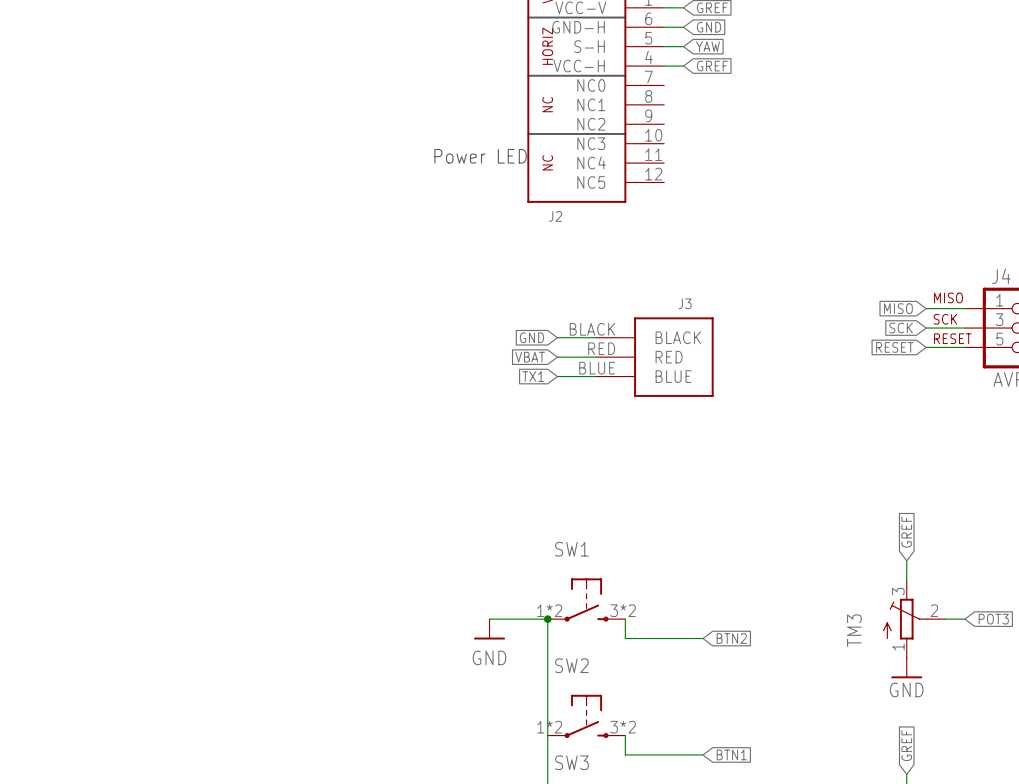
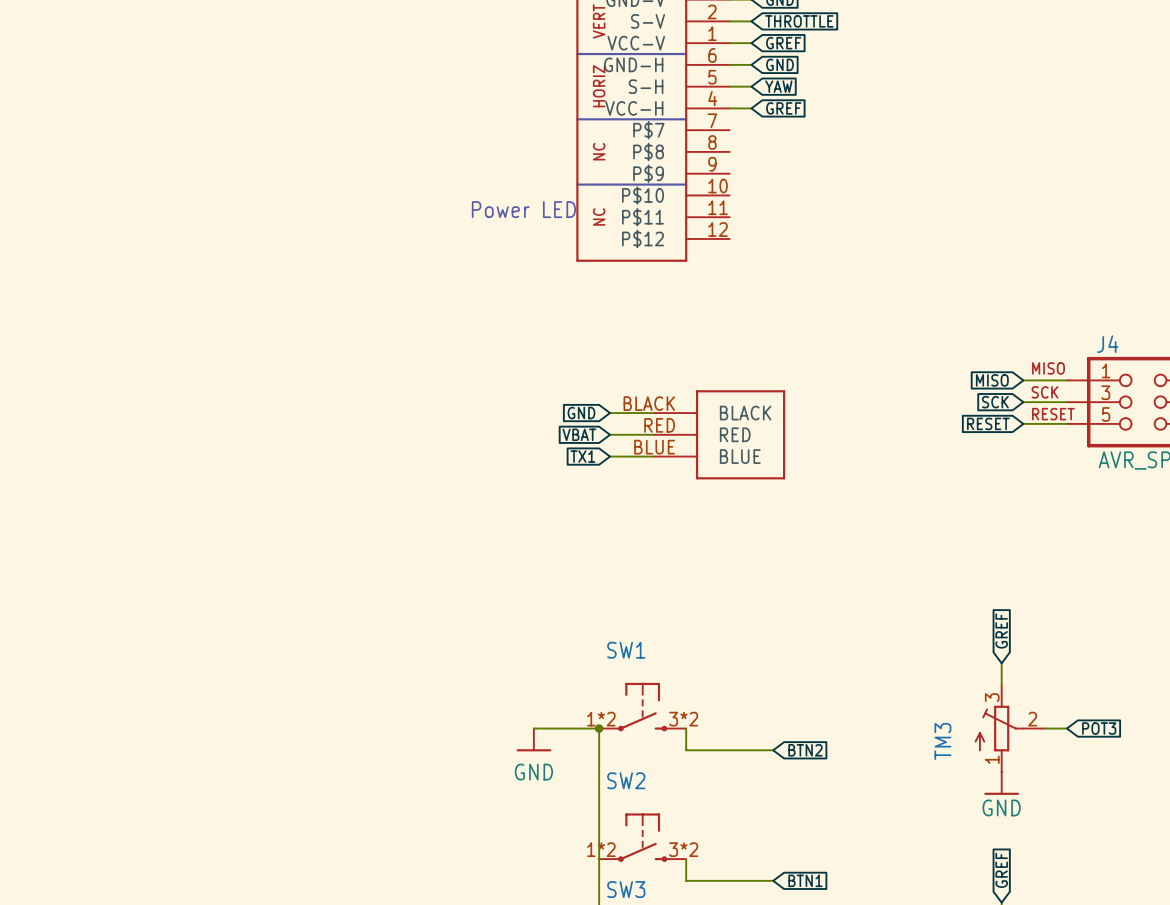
J2 pin name: NC0 (591, 85) -> P$7 (648, 130)
J2 pin name: NC1 (591, 104) -> P$8 (648, 151)
J2 pin name: NC2 (591, 124) -> P$9 (648, 173)
J2 pin name: NC3 (591, 143) -> P$10 (642, 195)
J2 pin name: NC4 (591, 162) -> P$11 (642, 217)
J2 pin name: NC5 (591, 182) -> P$12 (642, 238)
J2 name: J2 (555, 216) -> none
J3 name: J3 (685, 303) -> none

